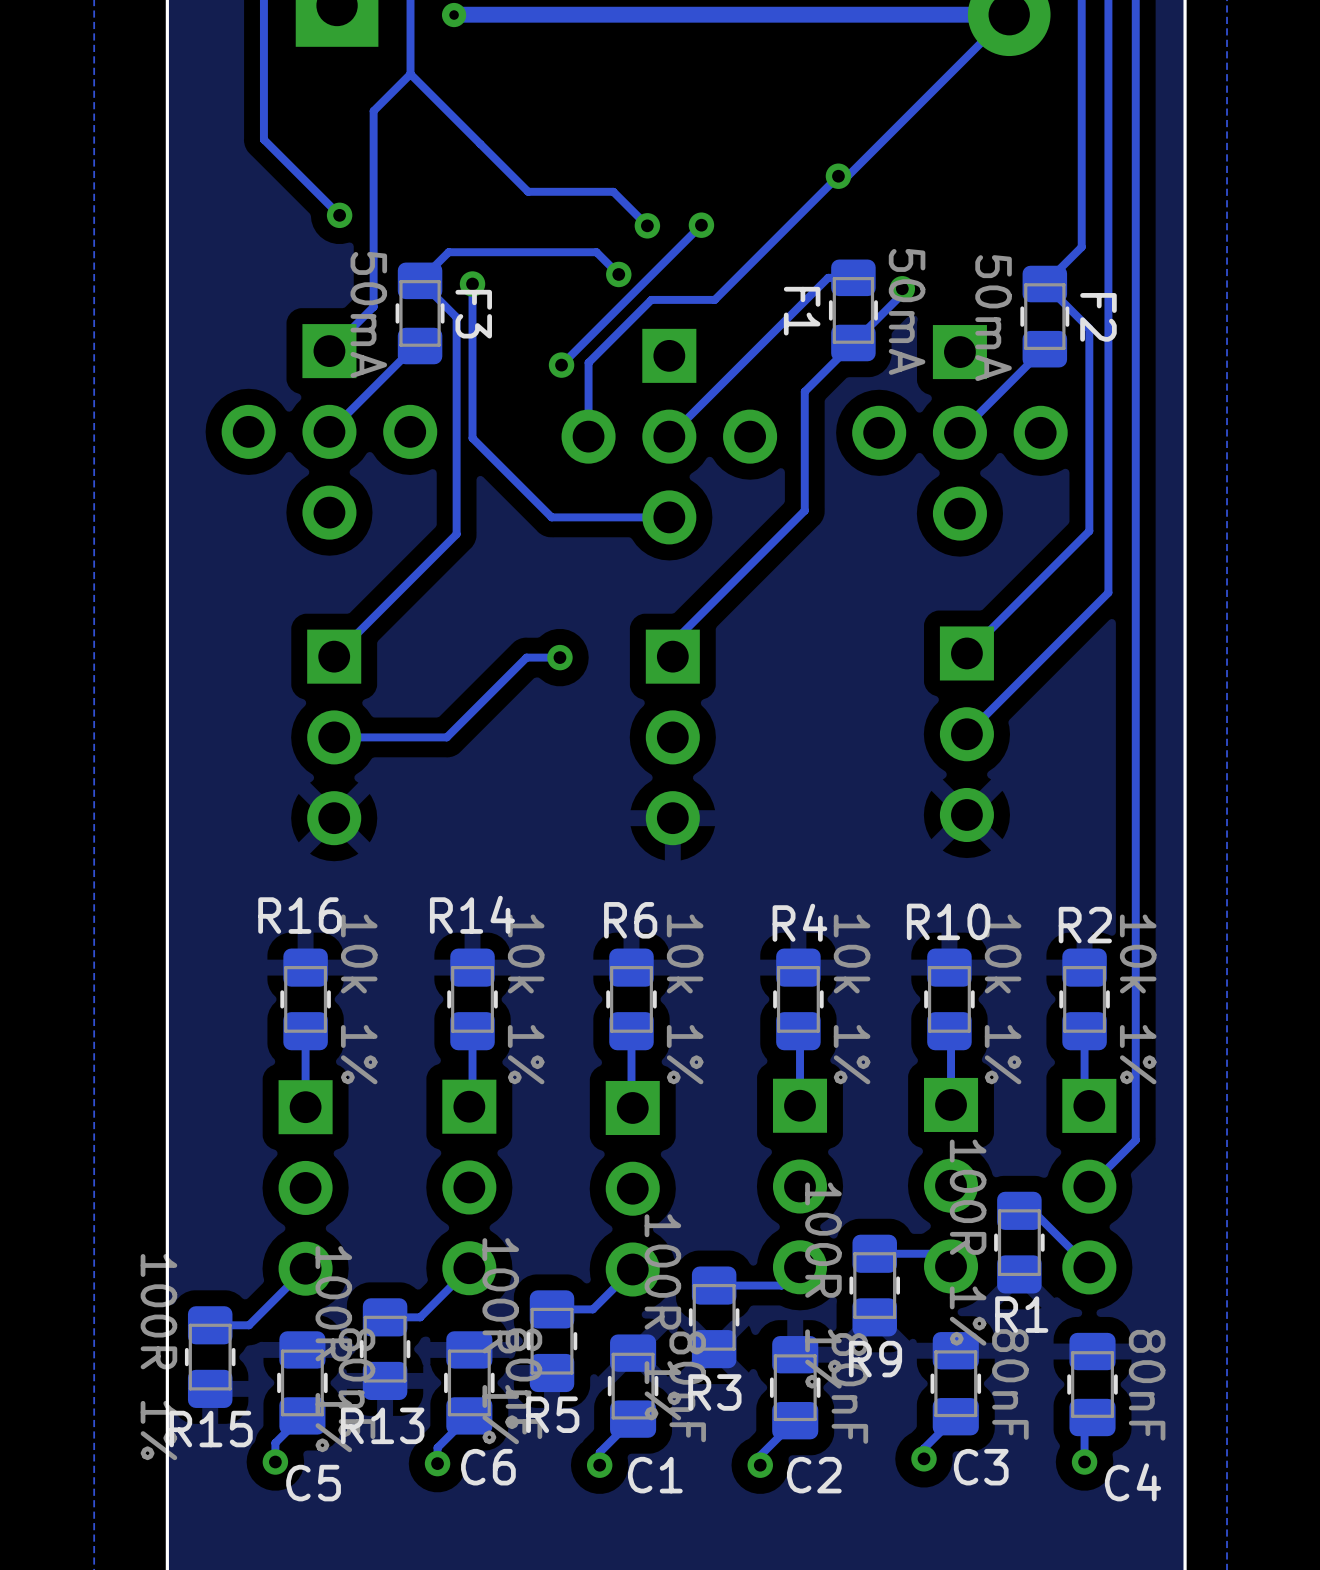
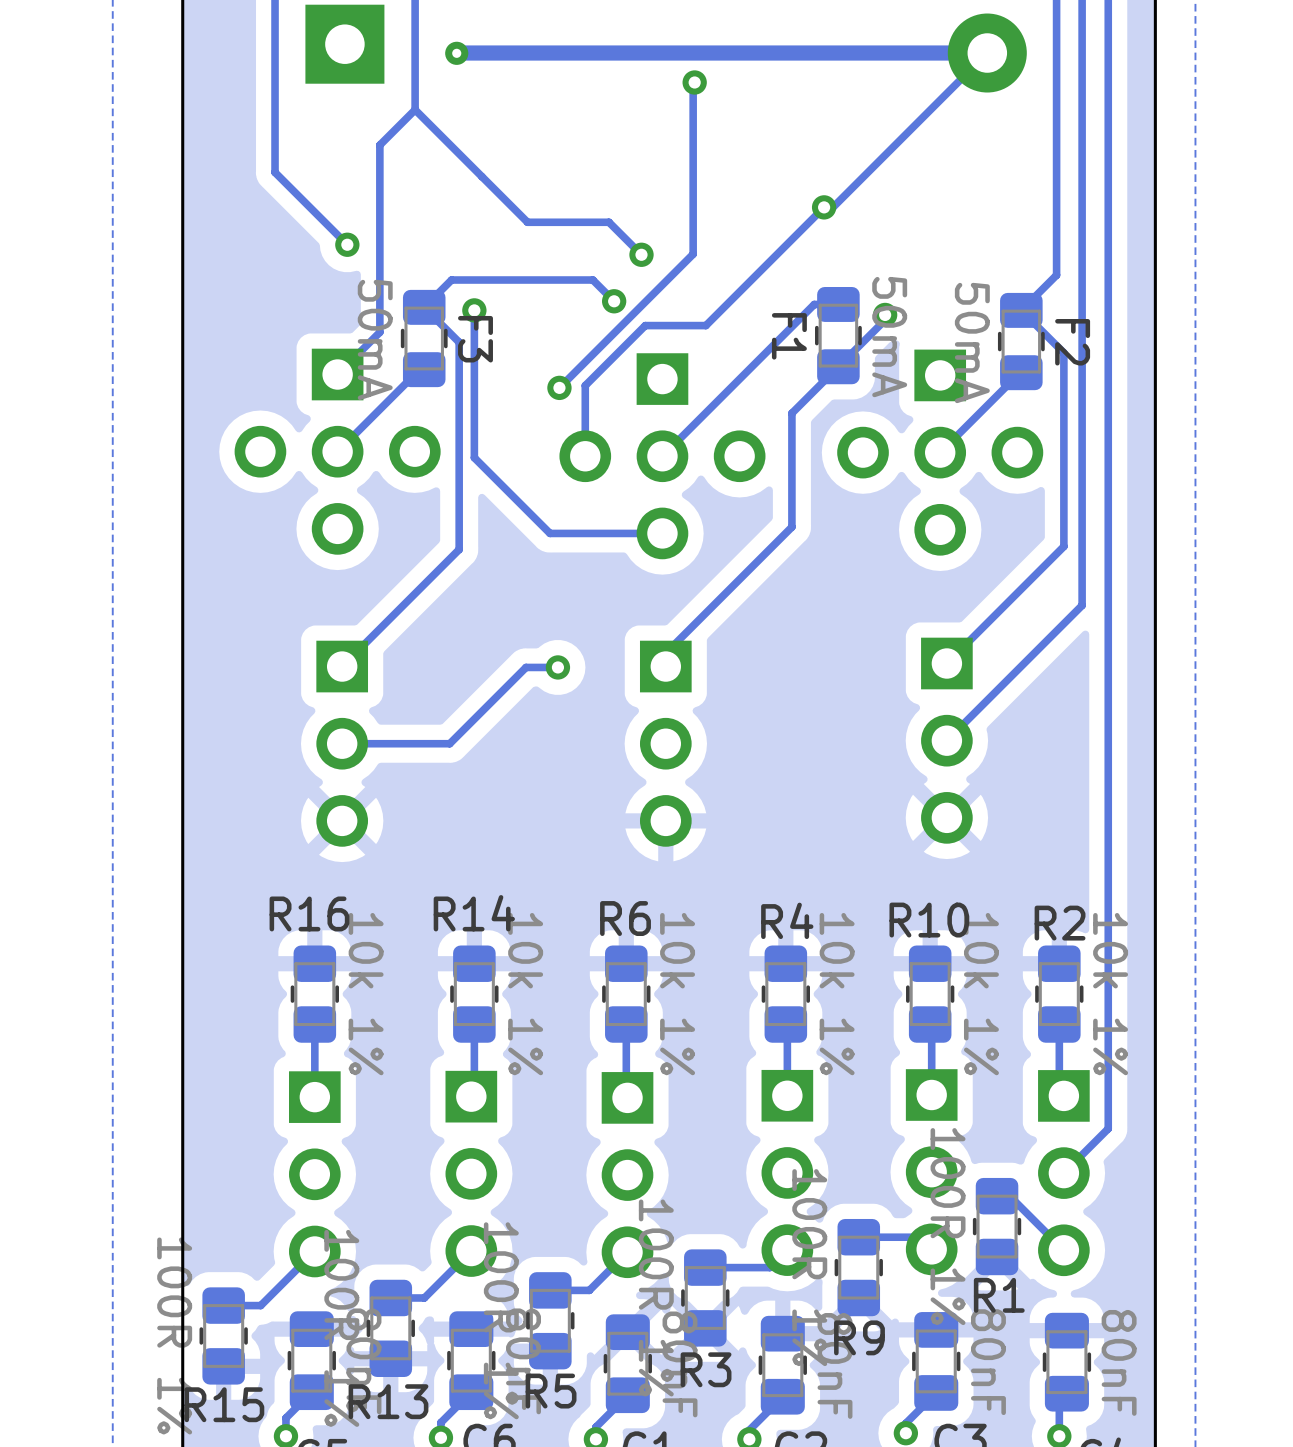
track: none -> (694, 82) (693, 84) (693, 254)
via position: (701, 225) -> (694, 82)

